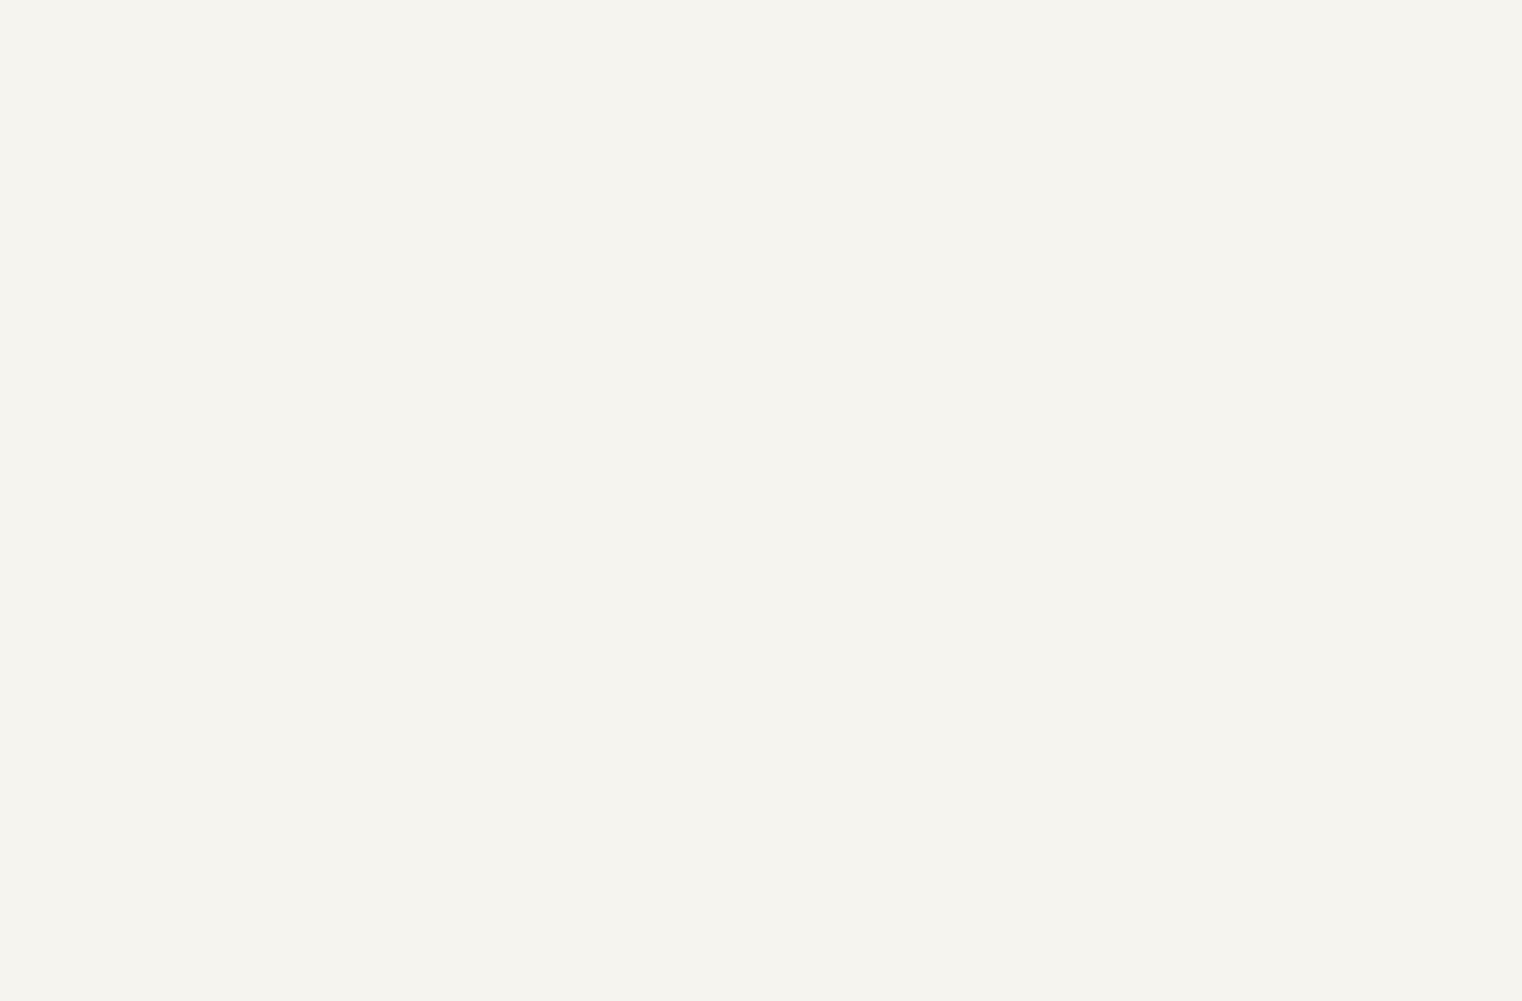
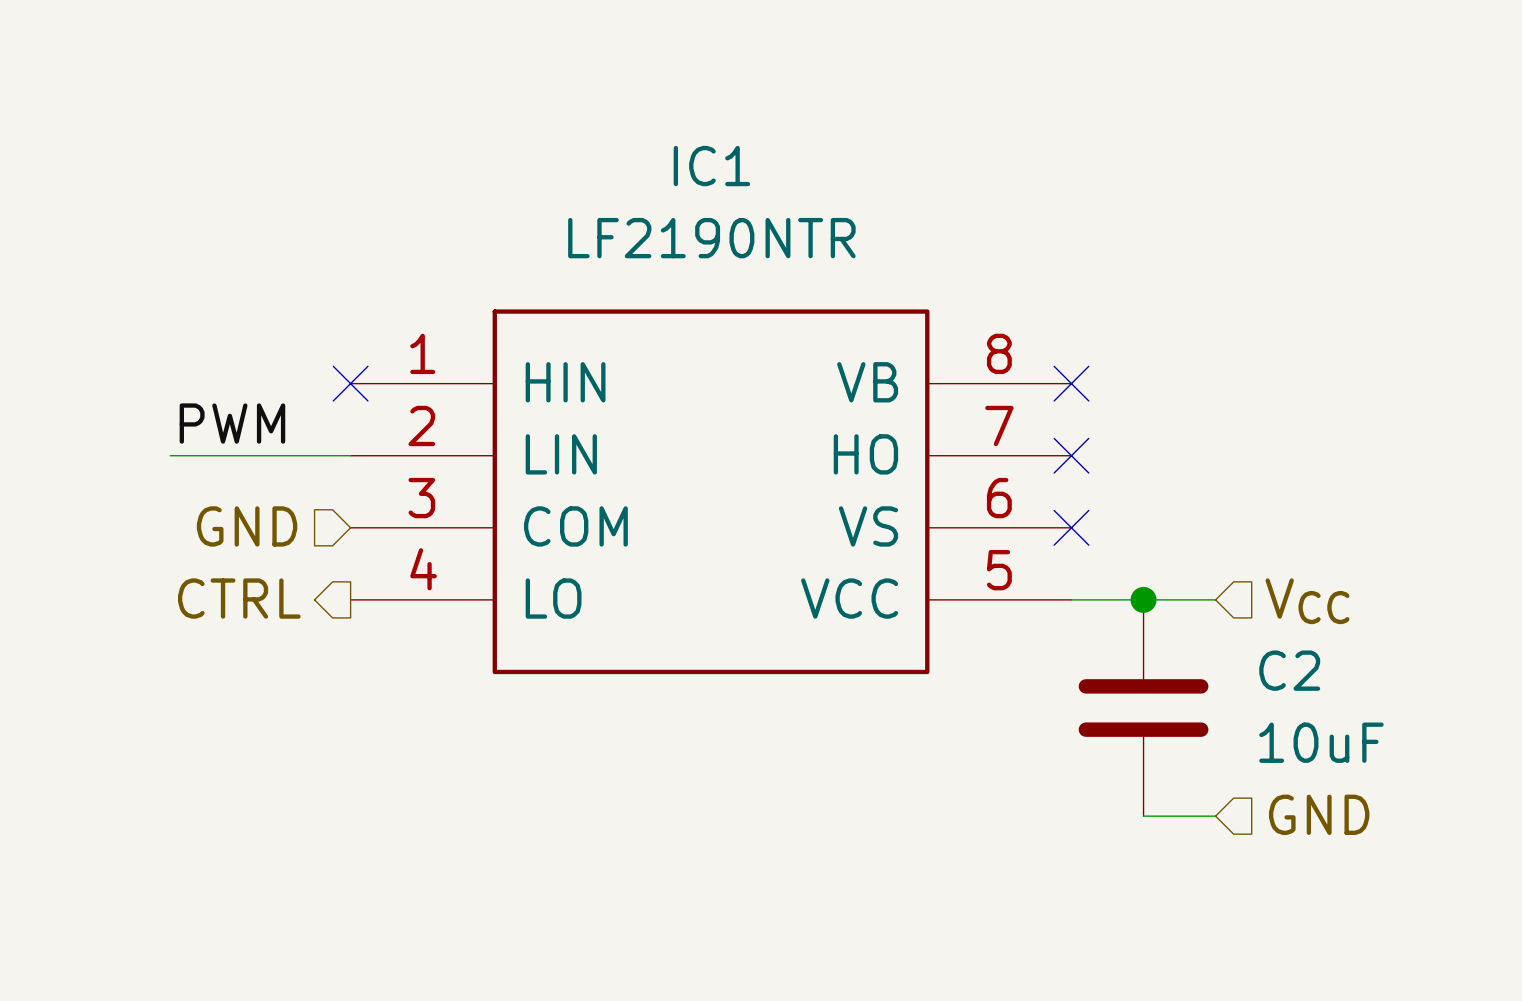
no-connect mark: none -> (350, 383)
no-connect mark: none -> (1071, 383)
label: none -> PWM (232, 423)
wire: none -> (170, 455) (350, 455)
no-connect mark: none -> (1071, 455)
IC1: none -> LF2190NTR (711, 491)
hierarchical label: none -> GND (247, 526)
no-connect mark: none -> (1071, 527)
hierarchical label: none -> CTRL (239, 598)
wire: none -> (1071, 599) (1215, 599)
junction: none -> (1143, 599)
hierarchical label: none -> VCC (1307, 601)
C2: none -> 10uF (1143, 708)
hierarchical label: none -> GND (1319, 814)
wire: none -> (1143, 816) (1215, 816)

